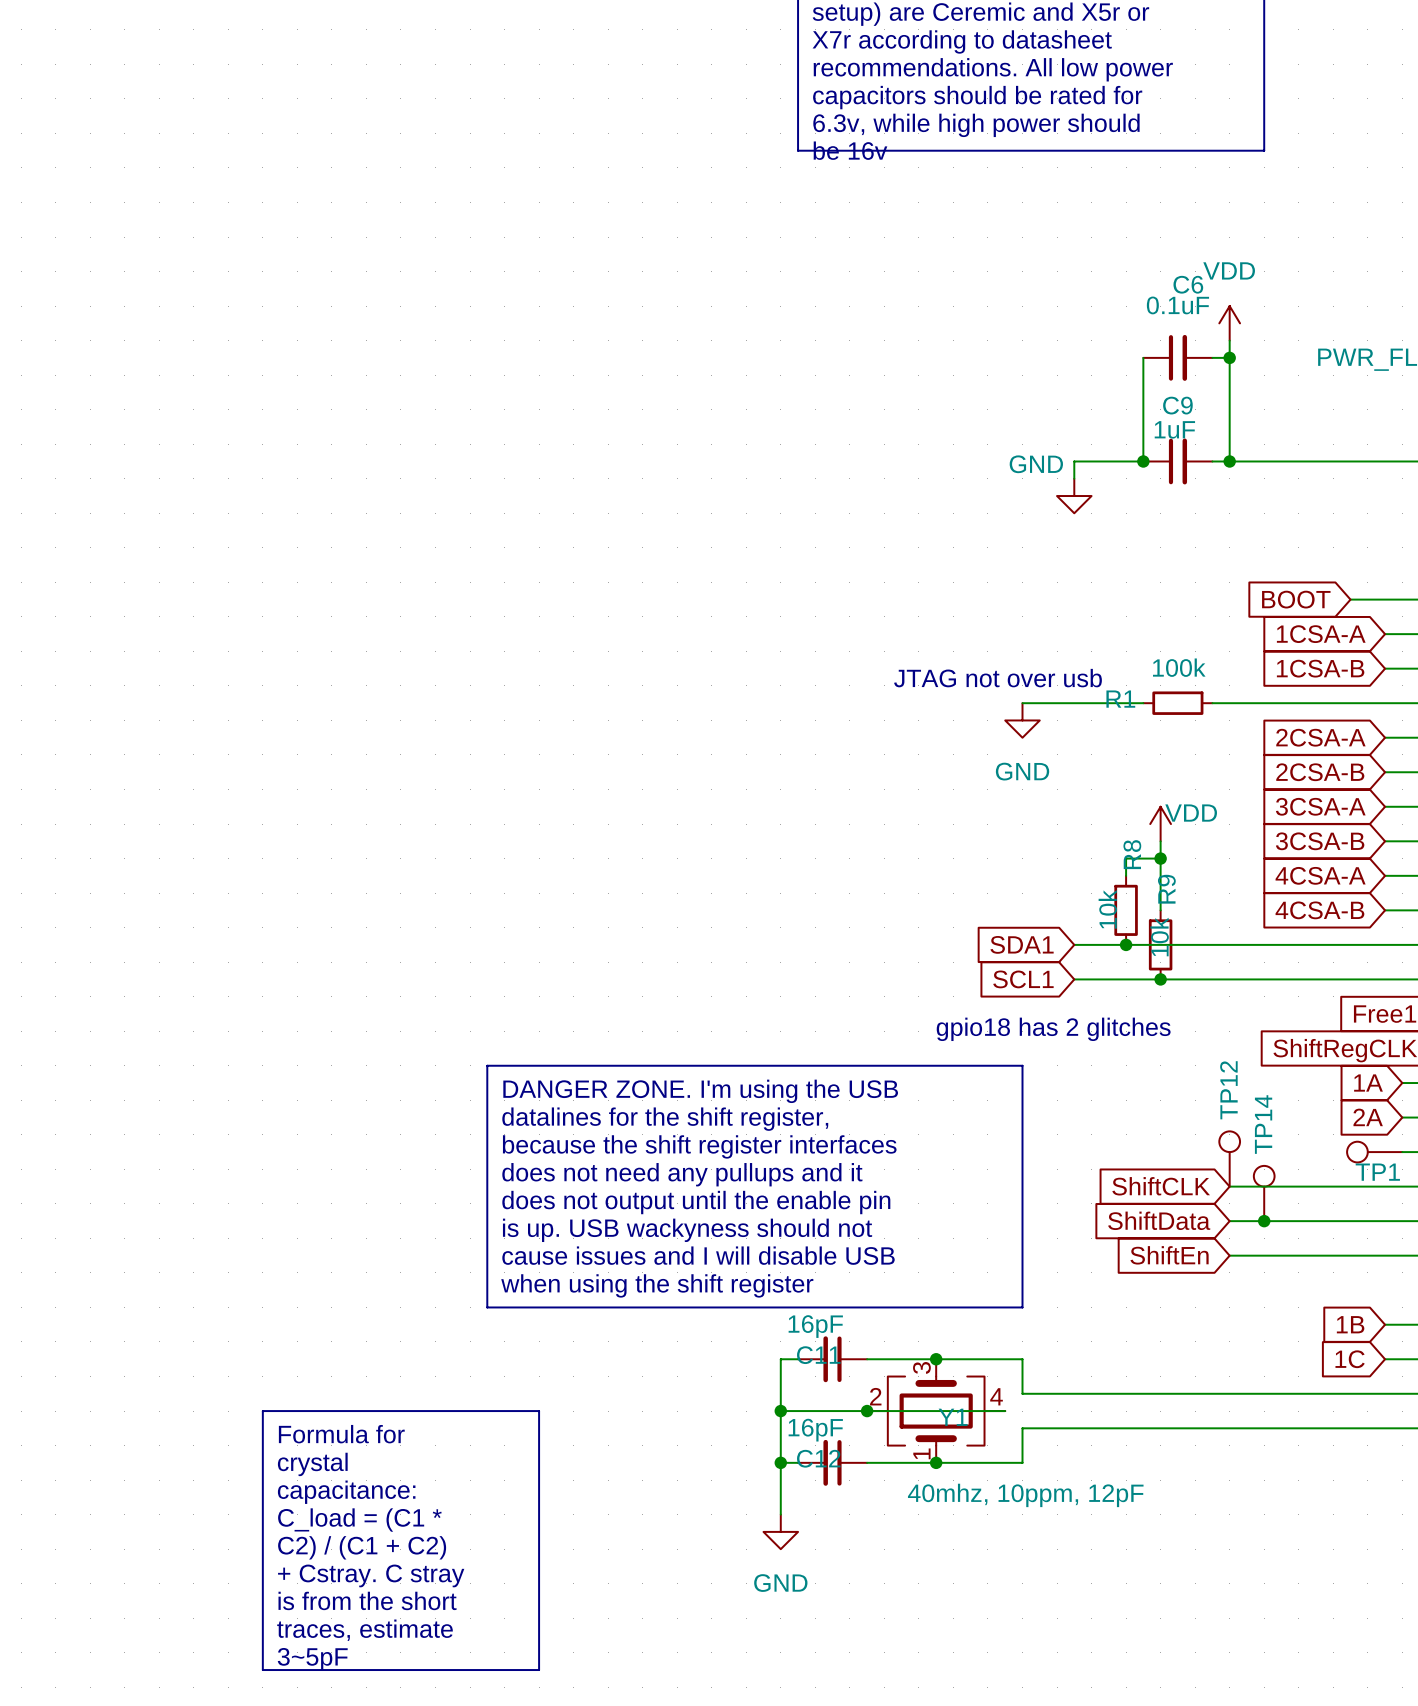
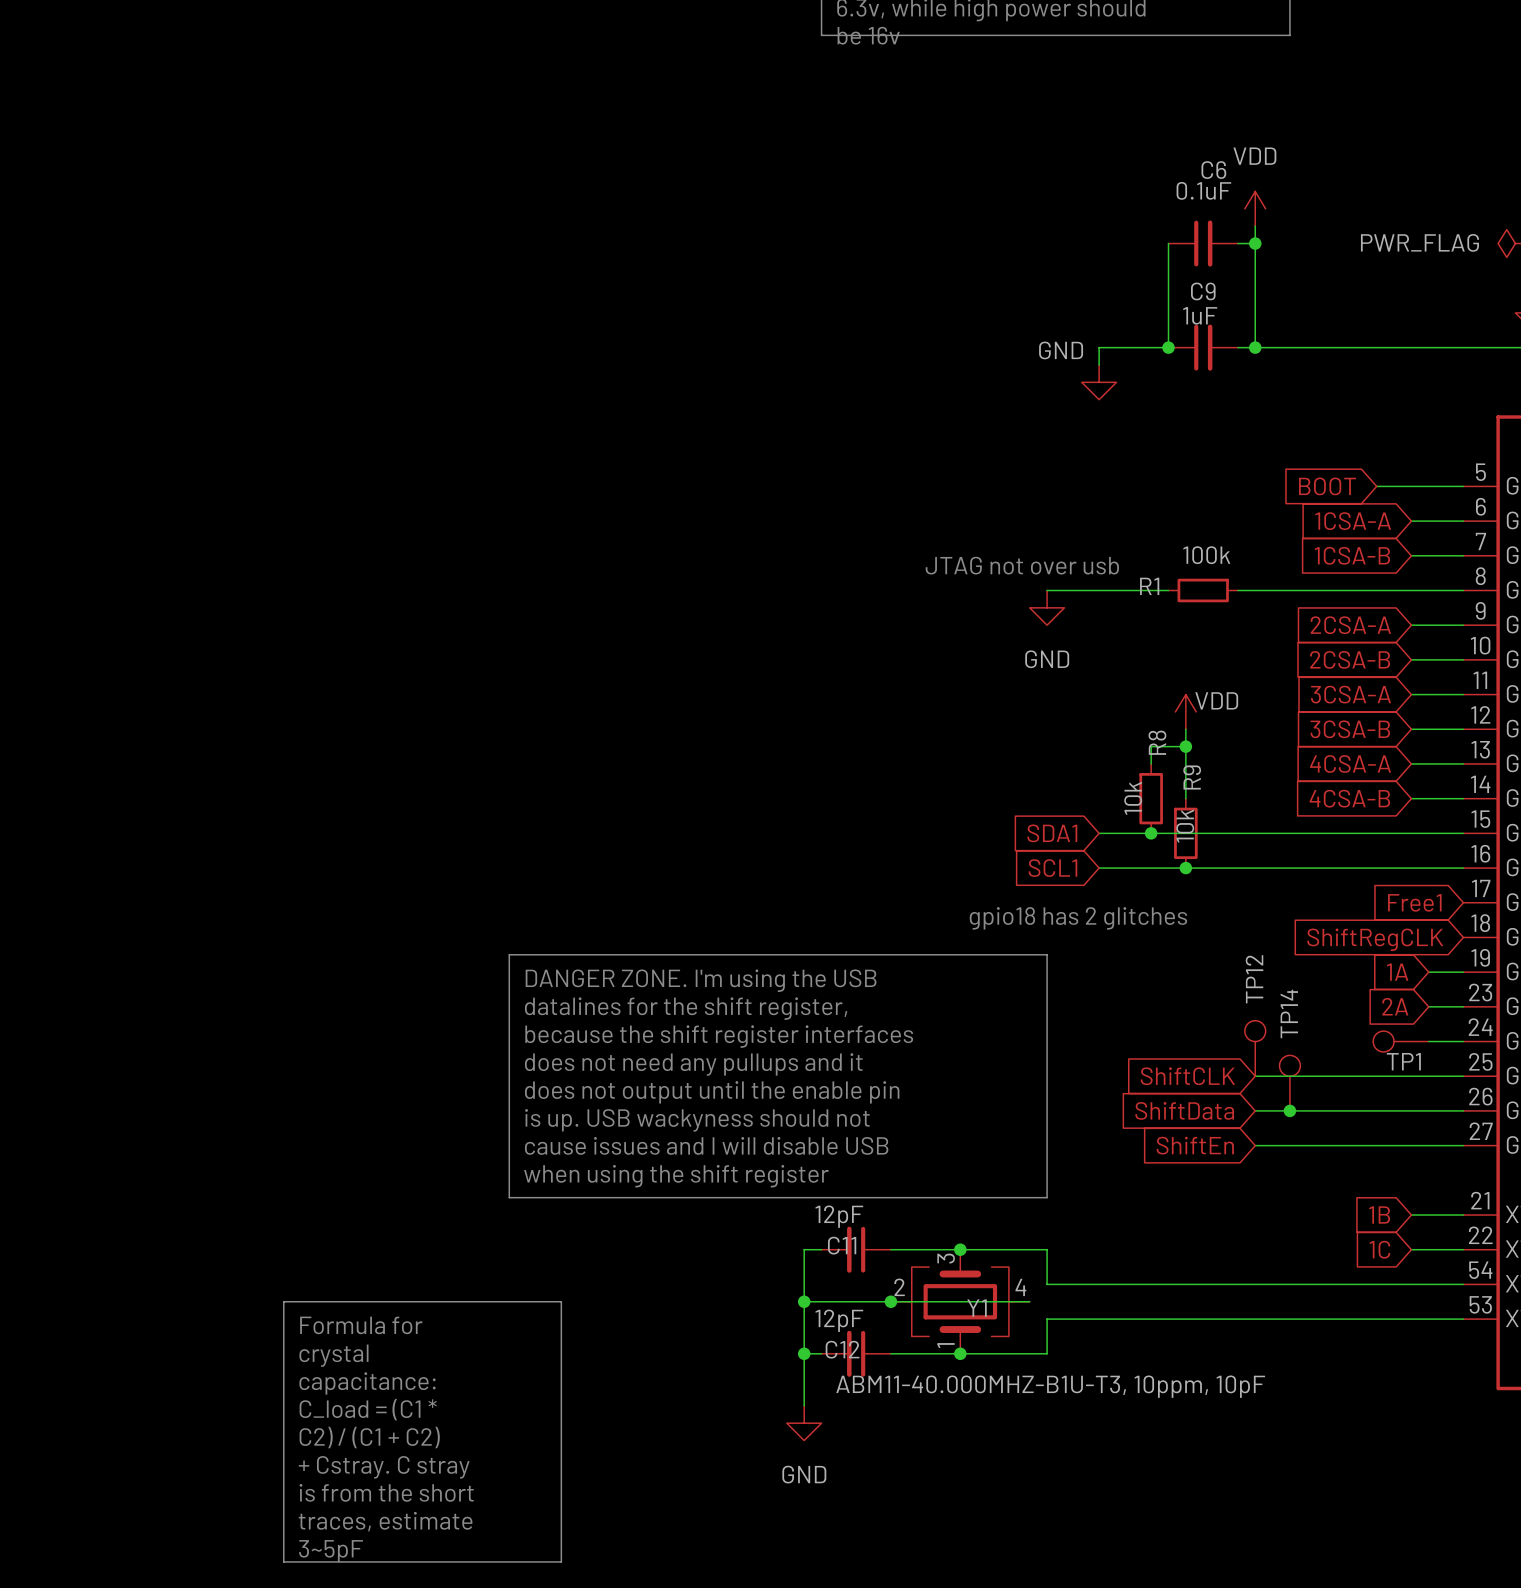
C11 value: 16pF (815, 1326) -> 12pF (839, 1216)
C12 value: 16pF (815, 1430) -> 12pF (839, 1320)
Y1 value: 40mhz, 10ppm, 12pF (1025, 1495) -> ABM11-40.000MHZ-B1U-T3, 10ppm, 10pF (1050, 1386)

